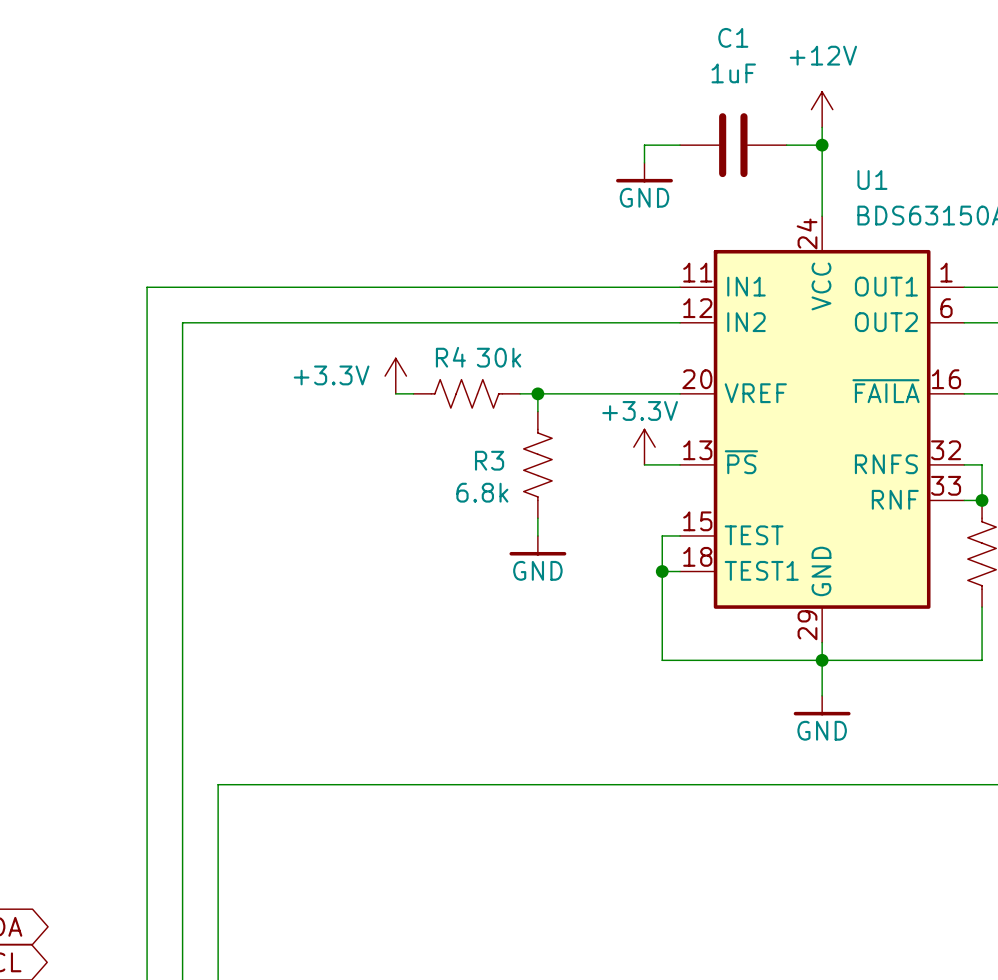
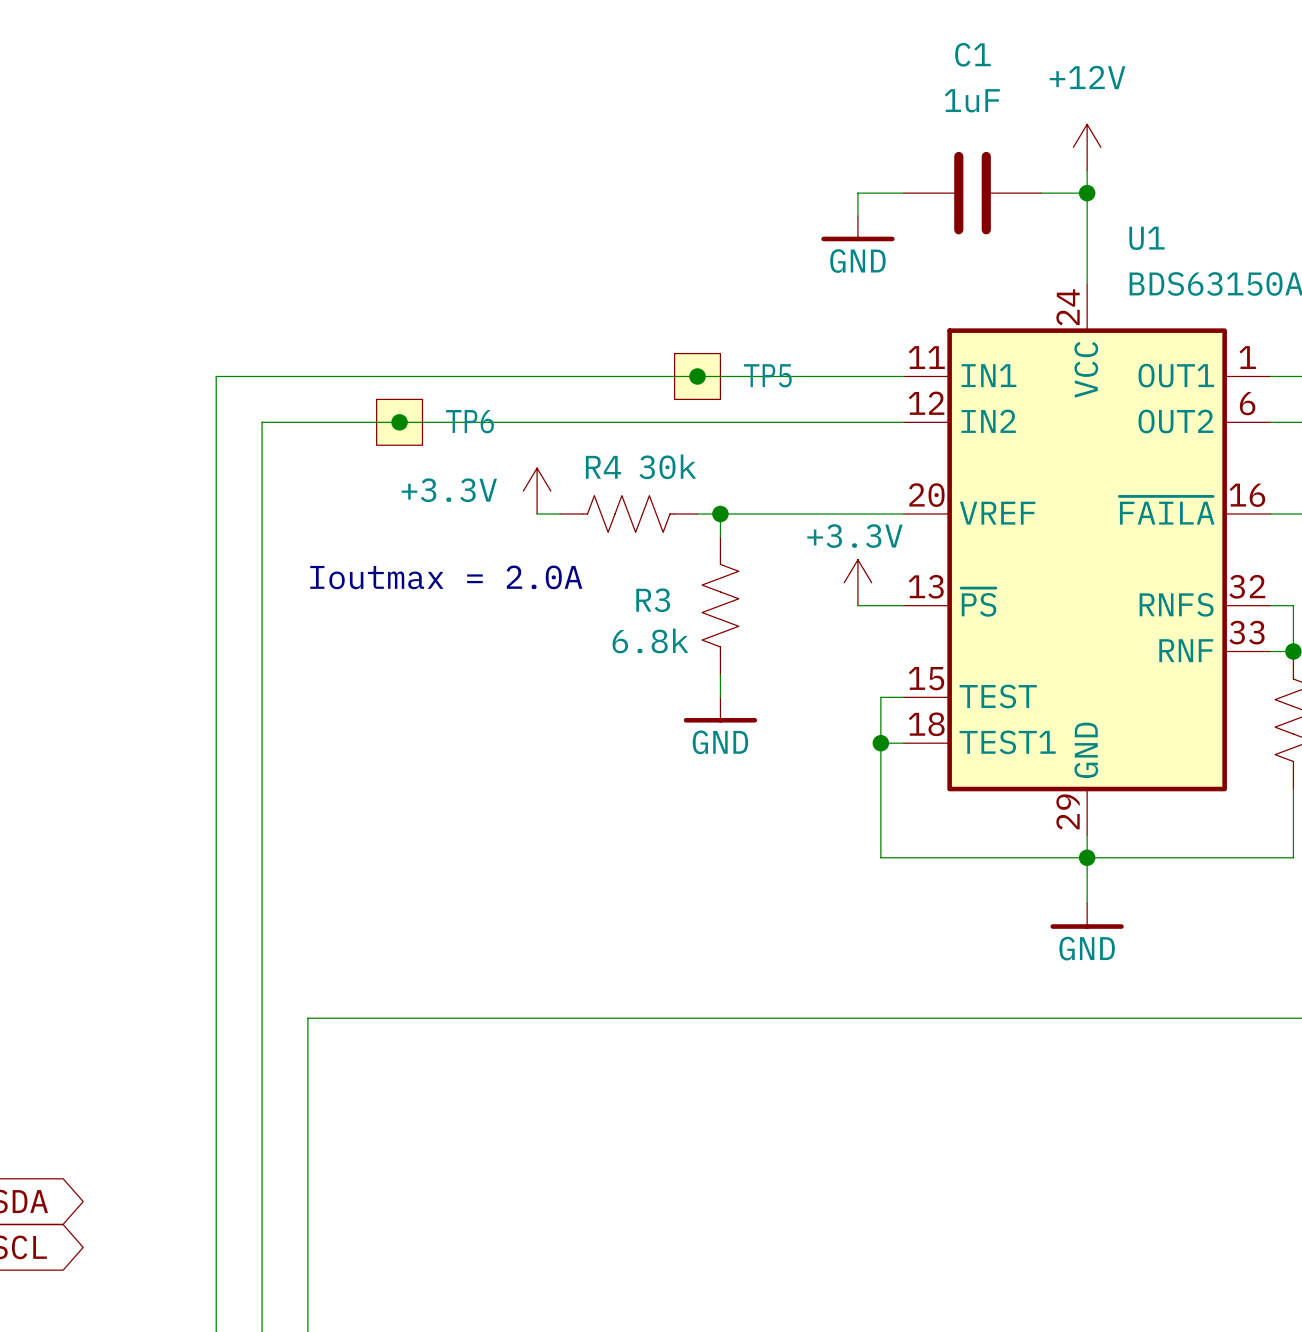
junction: none -> (697, 376)
TP5: none -> (697, 376)
junction: none -> (399, 422)
TP6: none -> (399, 422)
text: none -> Ioutmax = 2.0A (446, 577)

